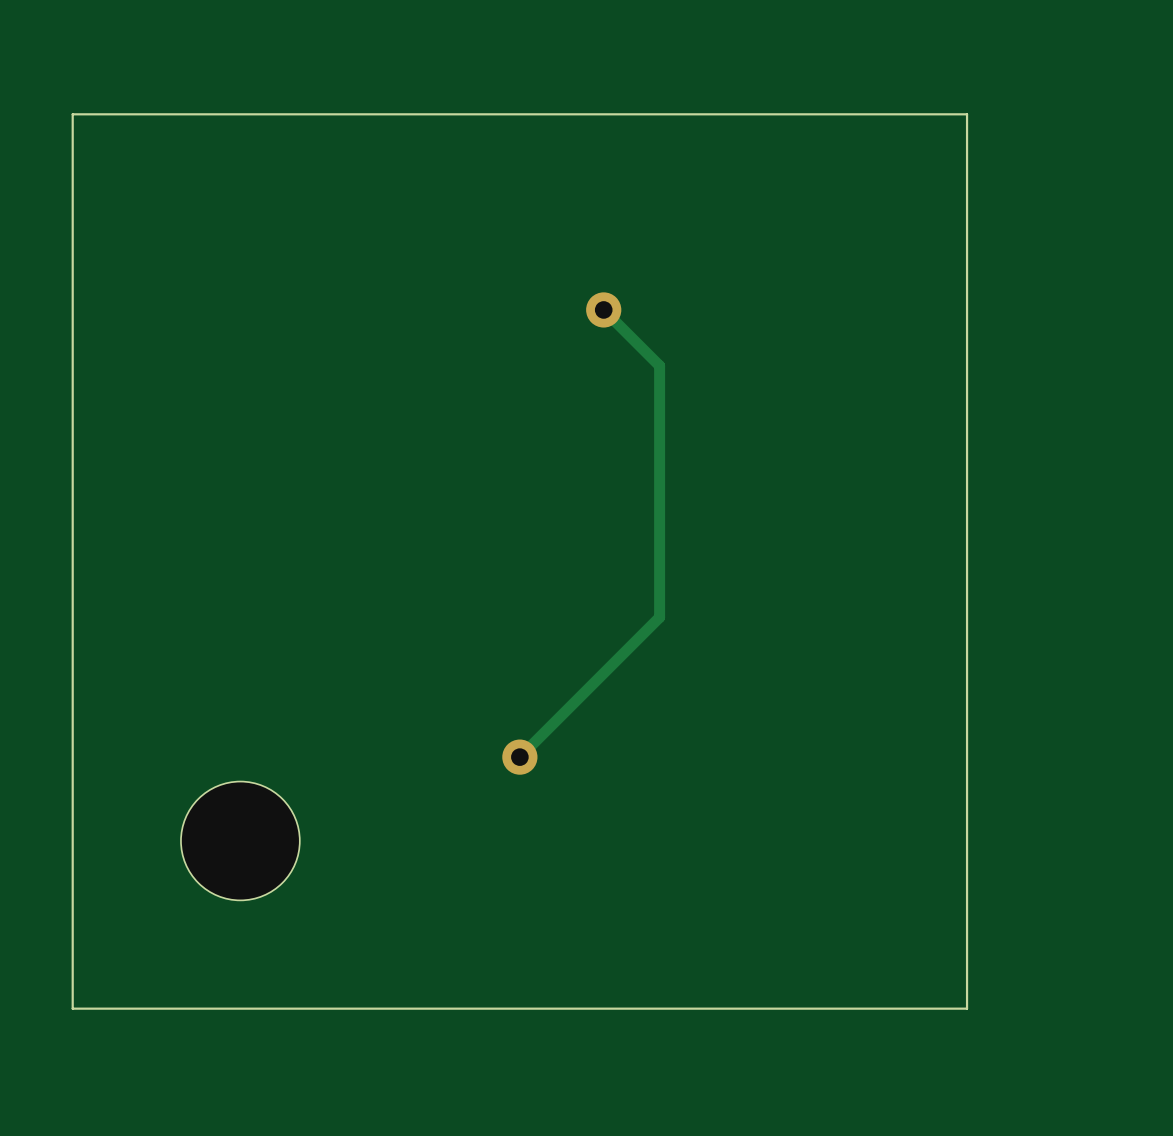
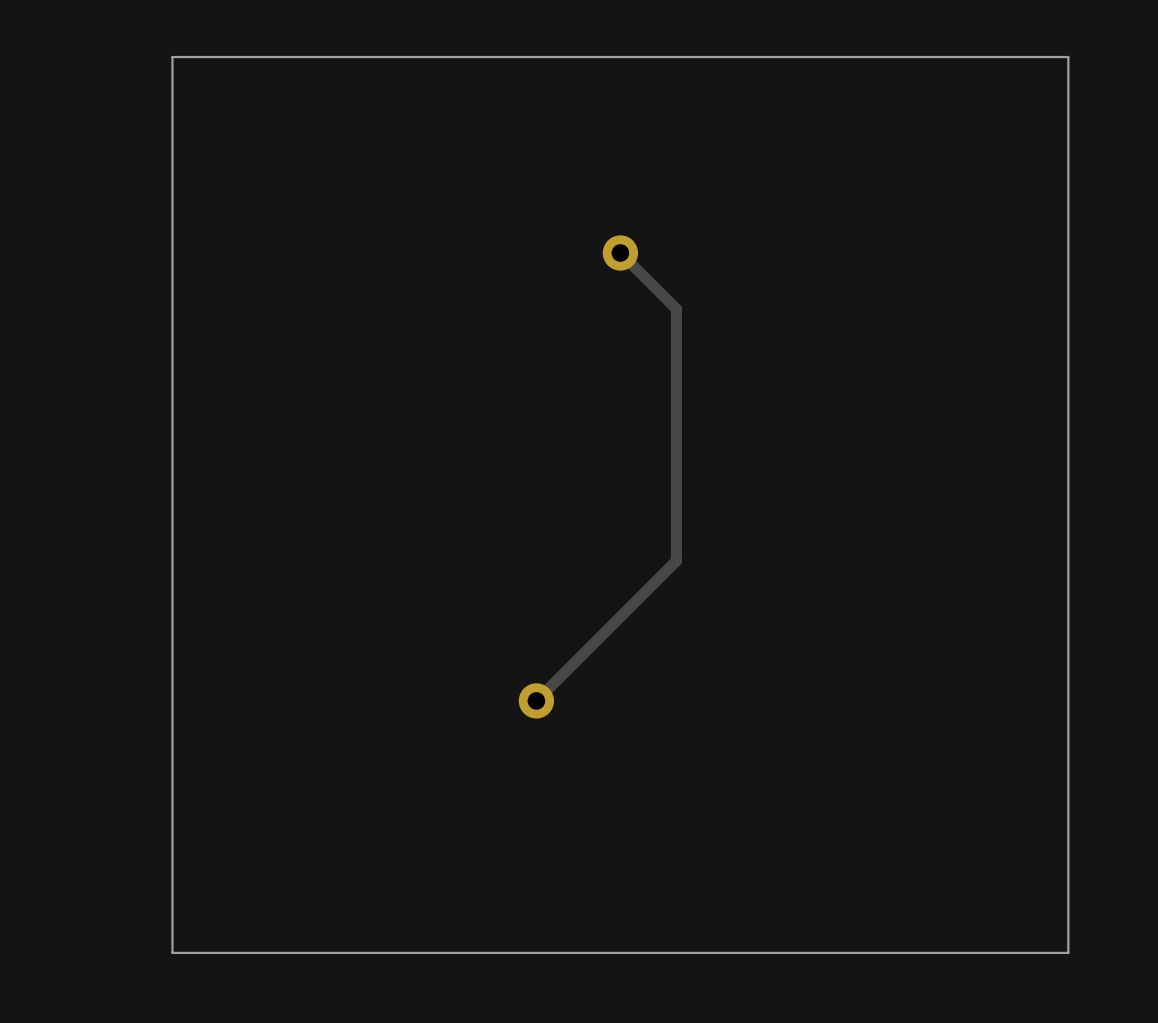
board edge: (156, 114) (72, 114) (72, 1008) (156, 1008) -> (172, 57) (172, 952)
board edge: (967, 114) (967, 1008) -> (984, 57) (1068, 57) (1068, 952) (984, 952)
part: (240, 840) -> none

